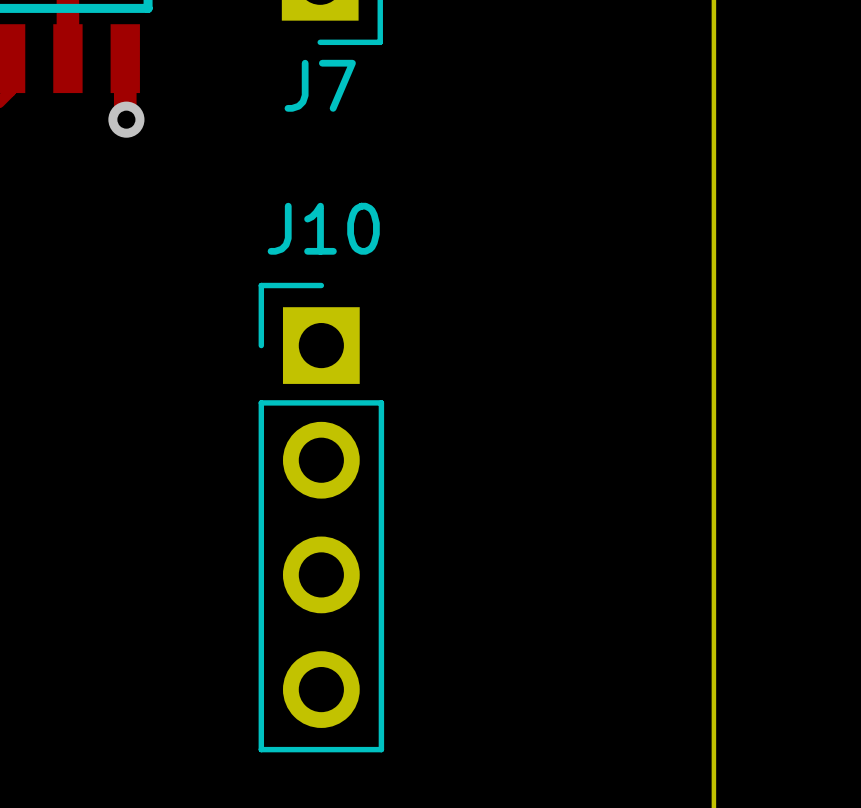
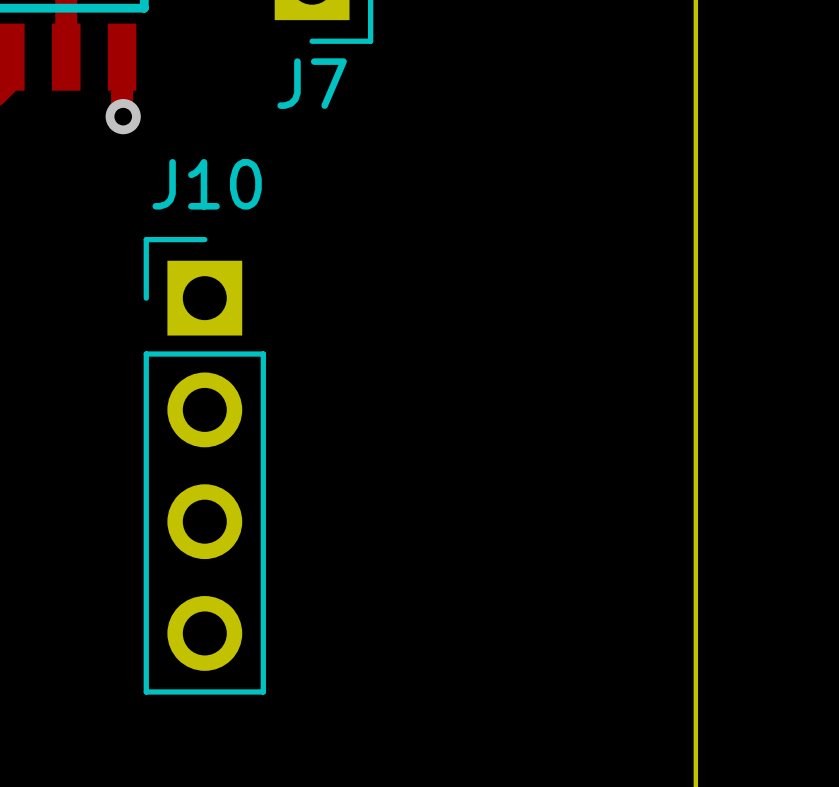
J10 position: (321, 517) -> (204, 465)

